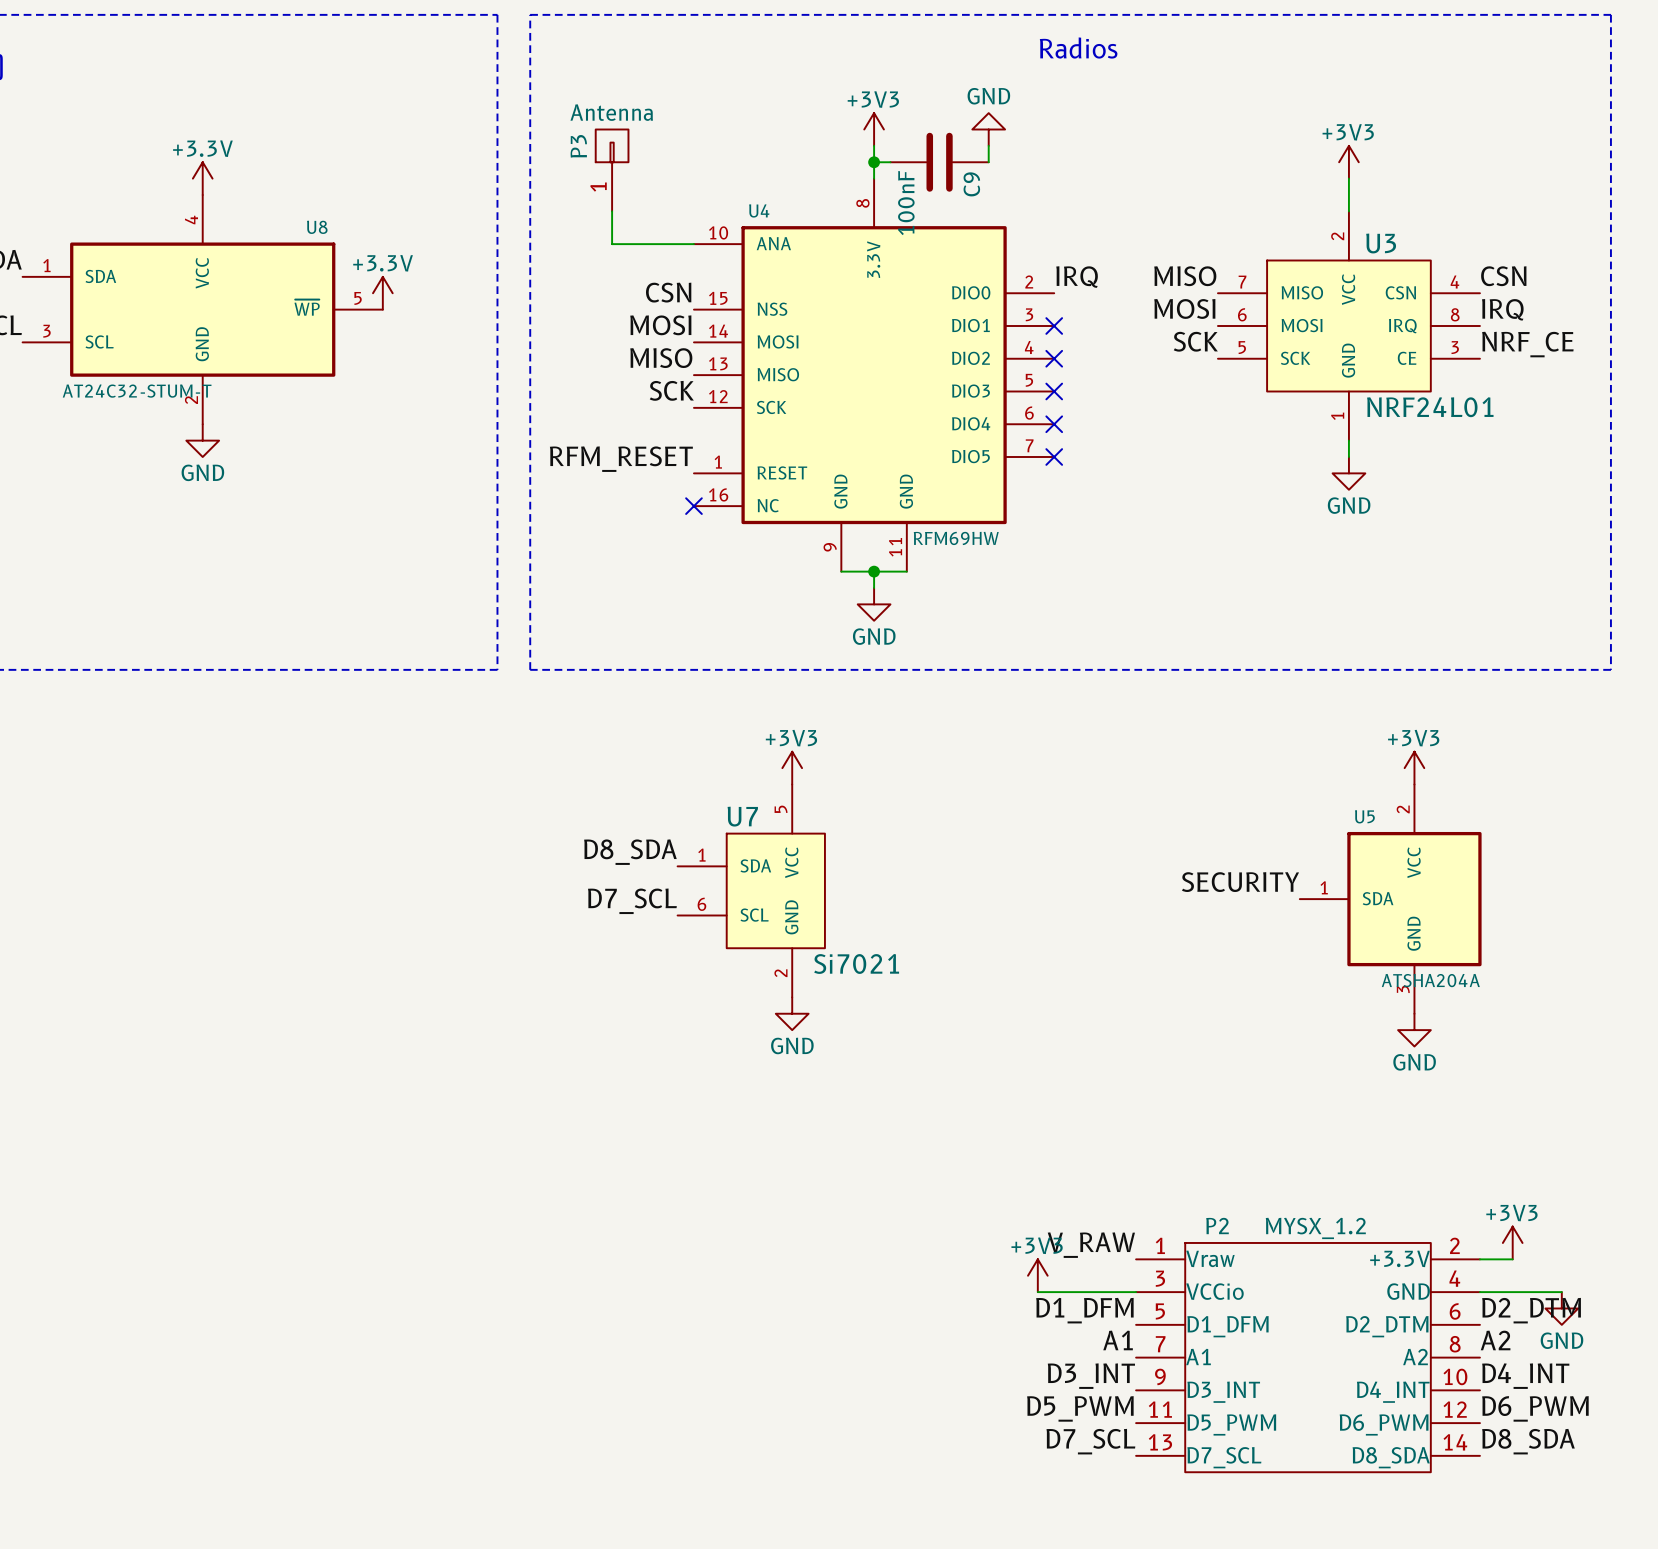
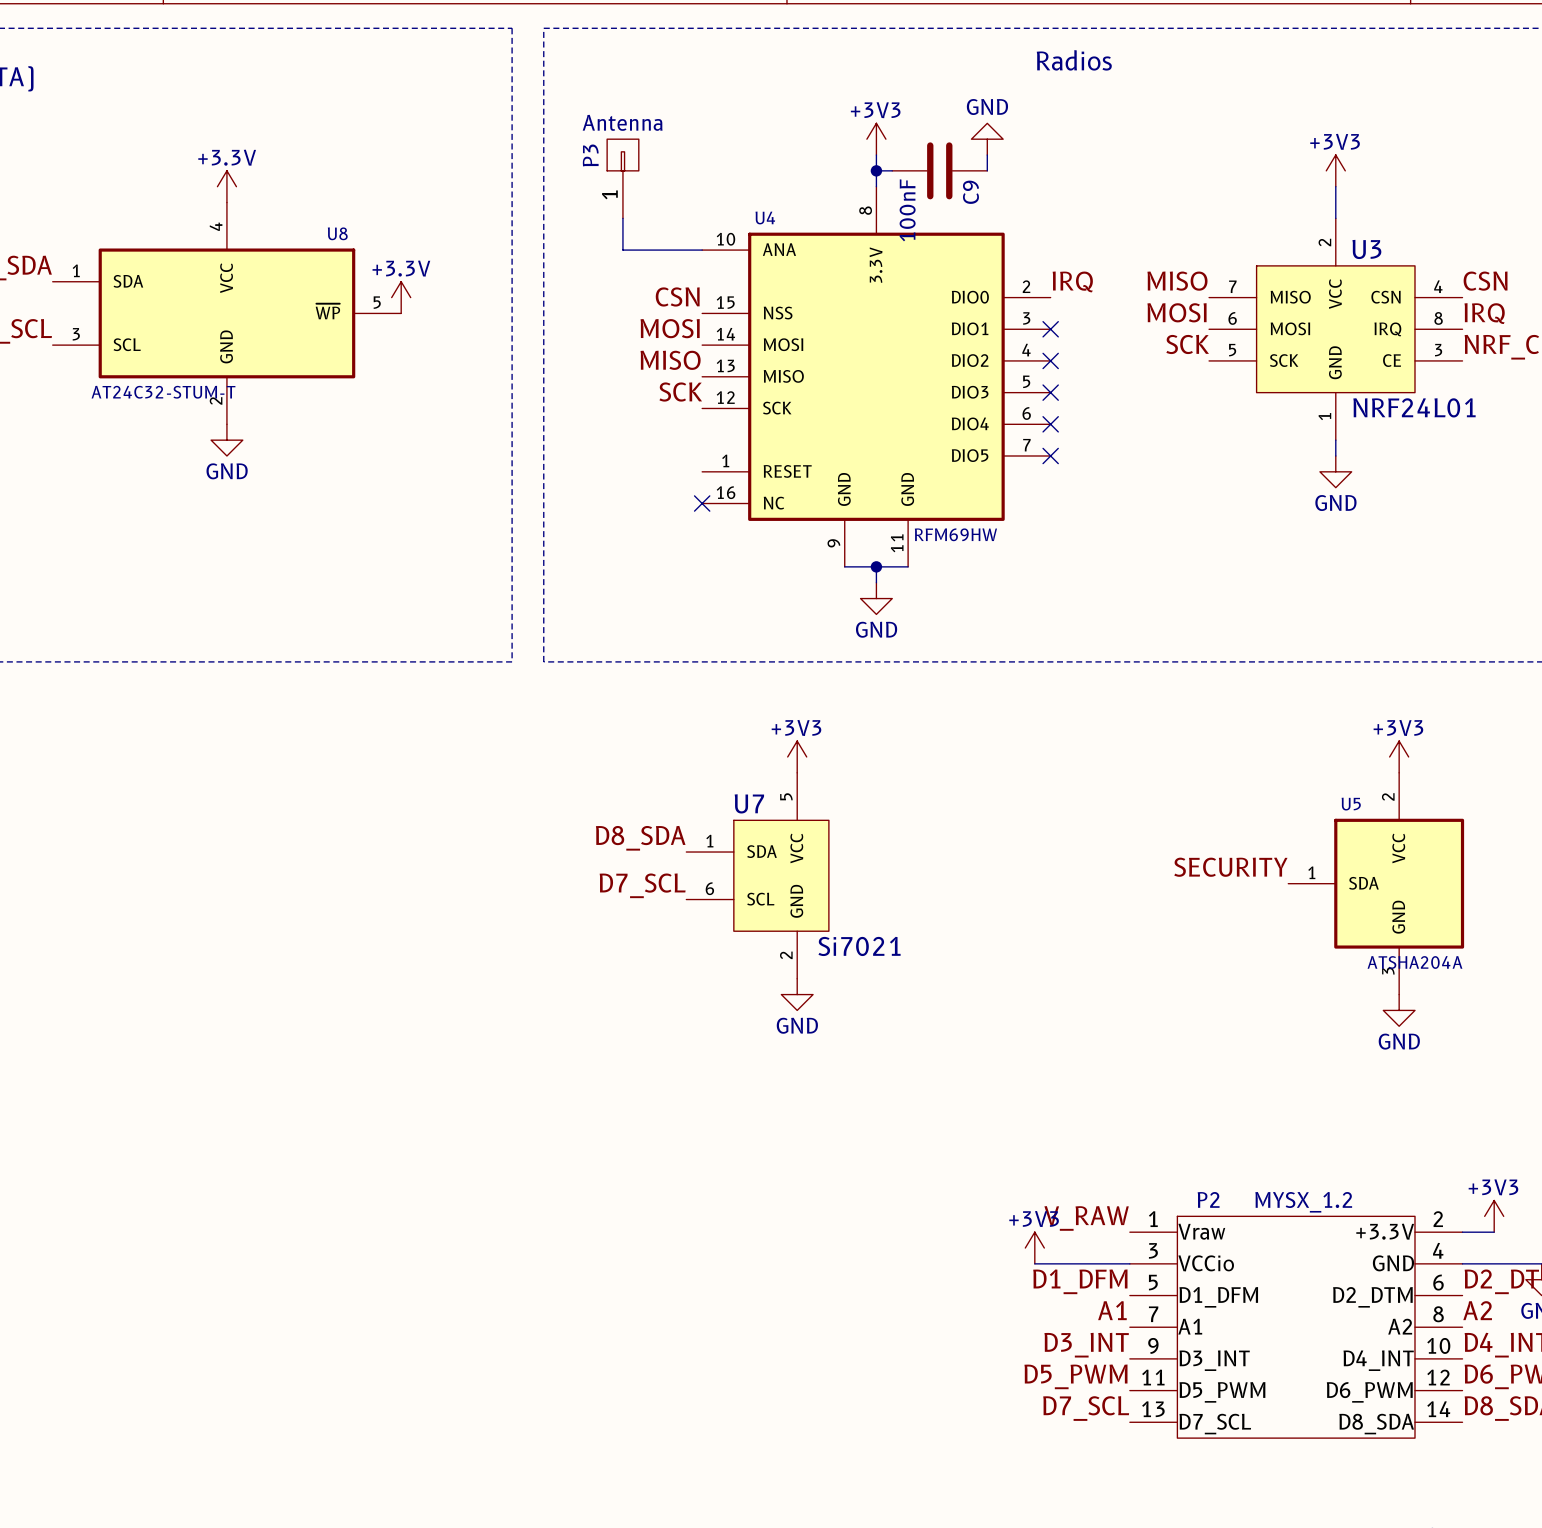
label: RFM_RESET (621, 459) -> none

